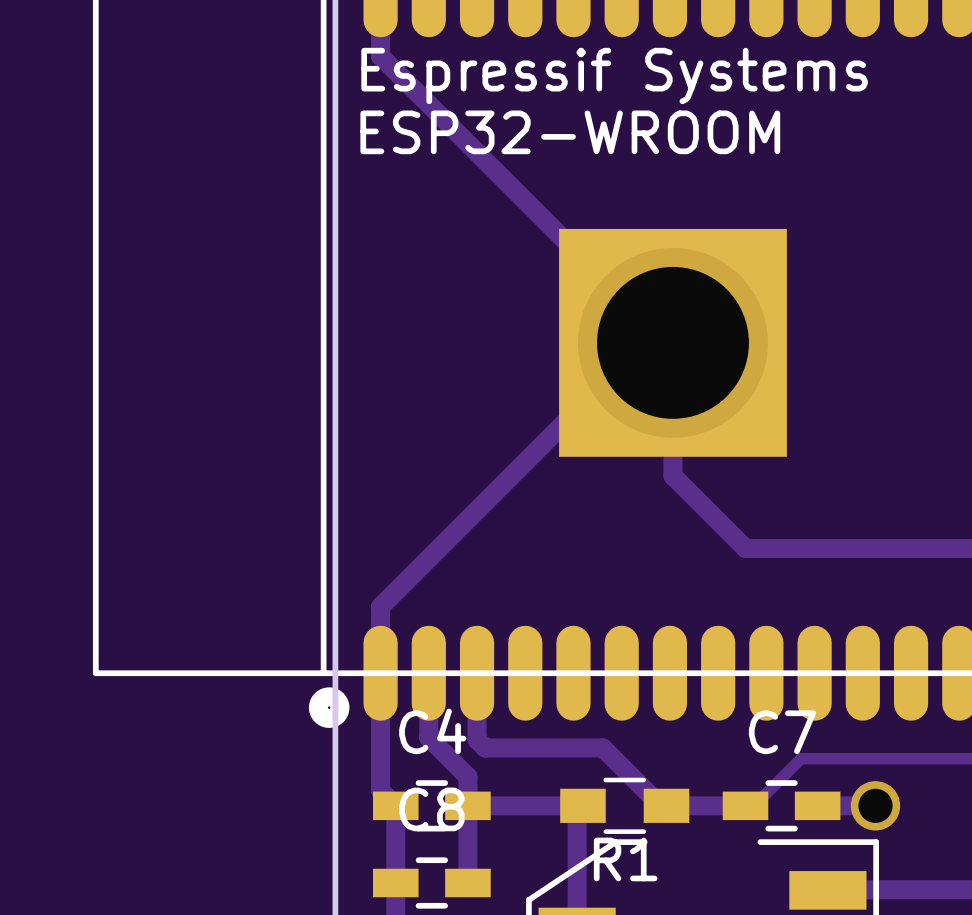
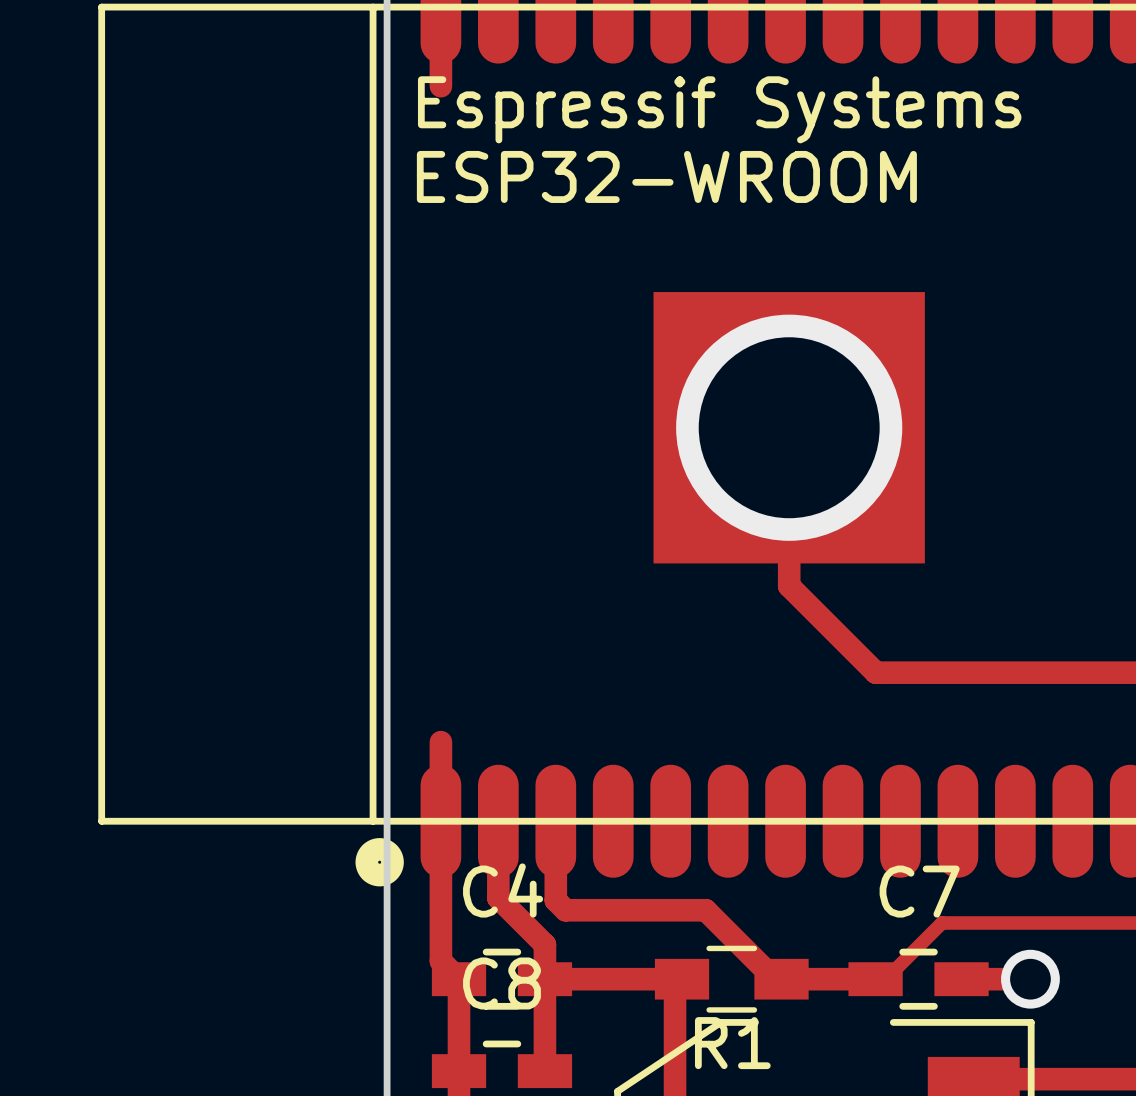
track: (380, 56) (667, 342) -> none
track: (644, 342) (380, 606) -> none

